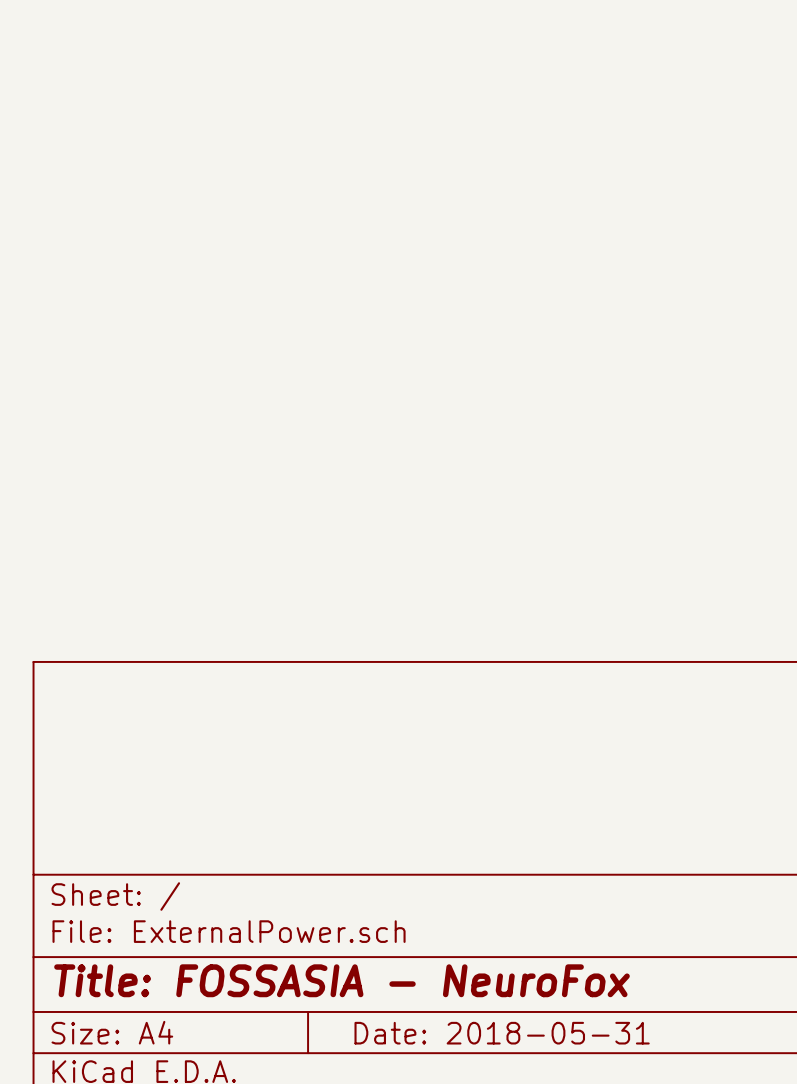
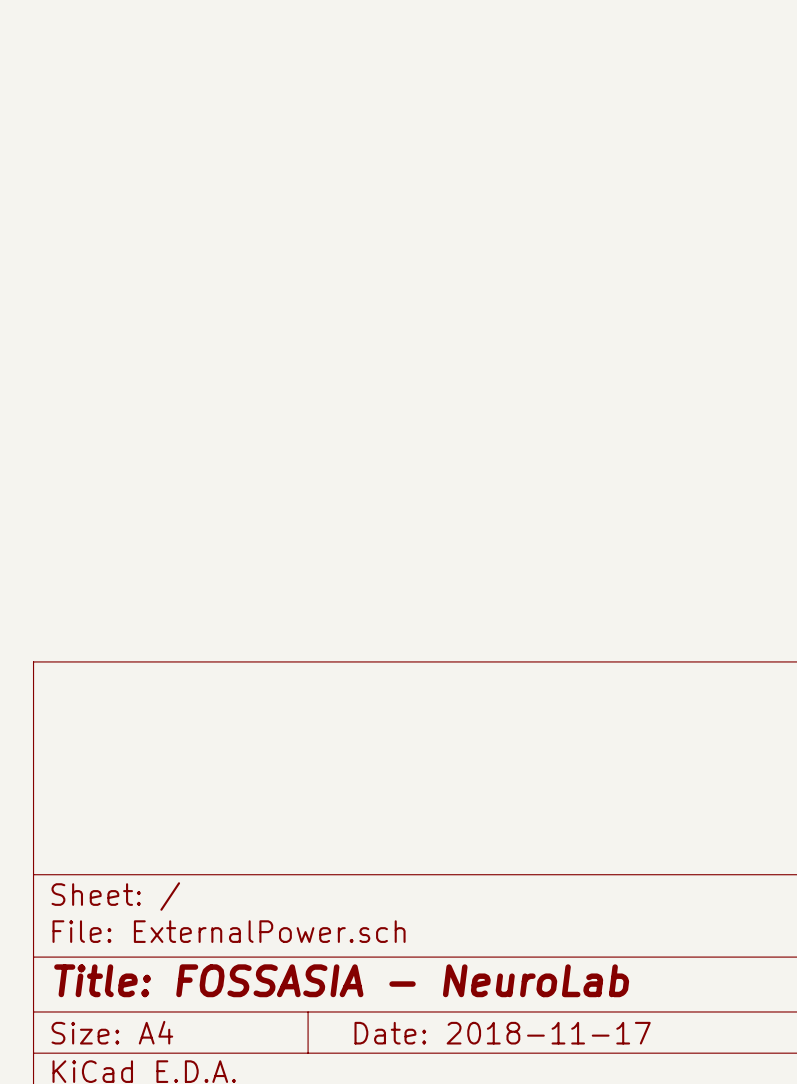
title block: Title: FOSSASIA - NeuroFox (341, 980) -> Title: FOSSASIA - NeuroLab (341, 980)
title block: Date: 2018-05-31 (502, 1033) -> Date: 2018-11-17 (502, 1033)

